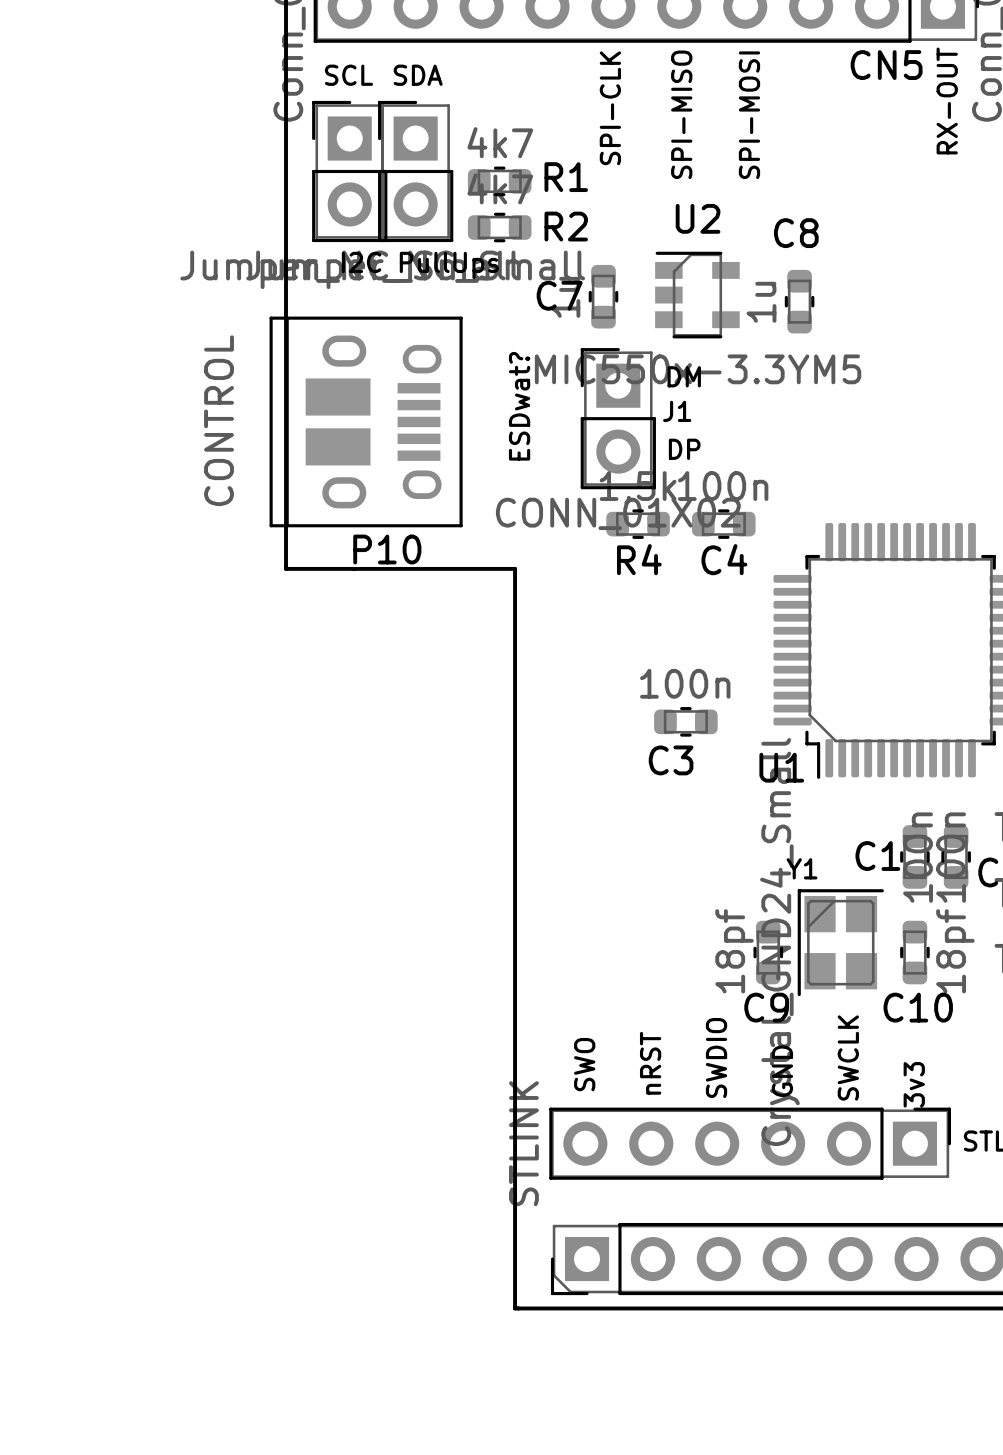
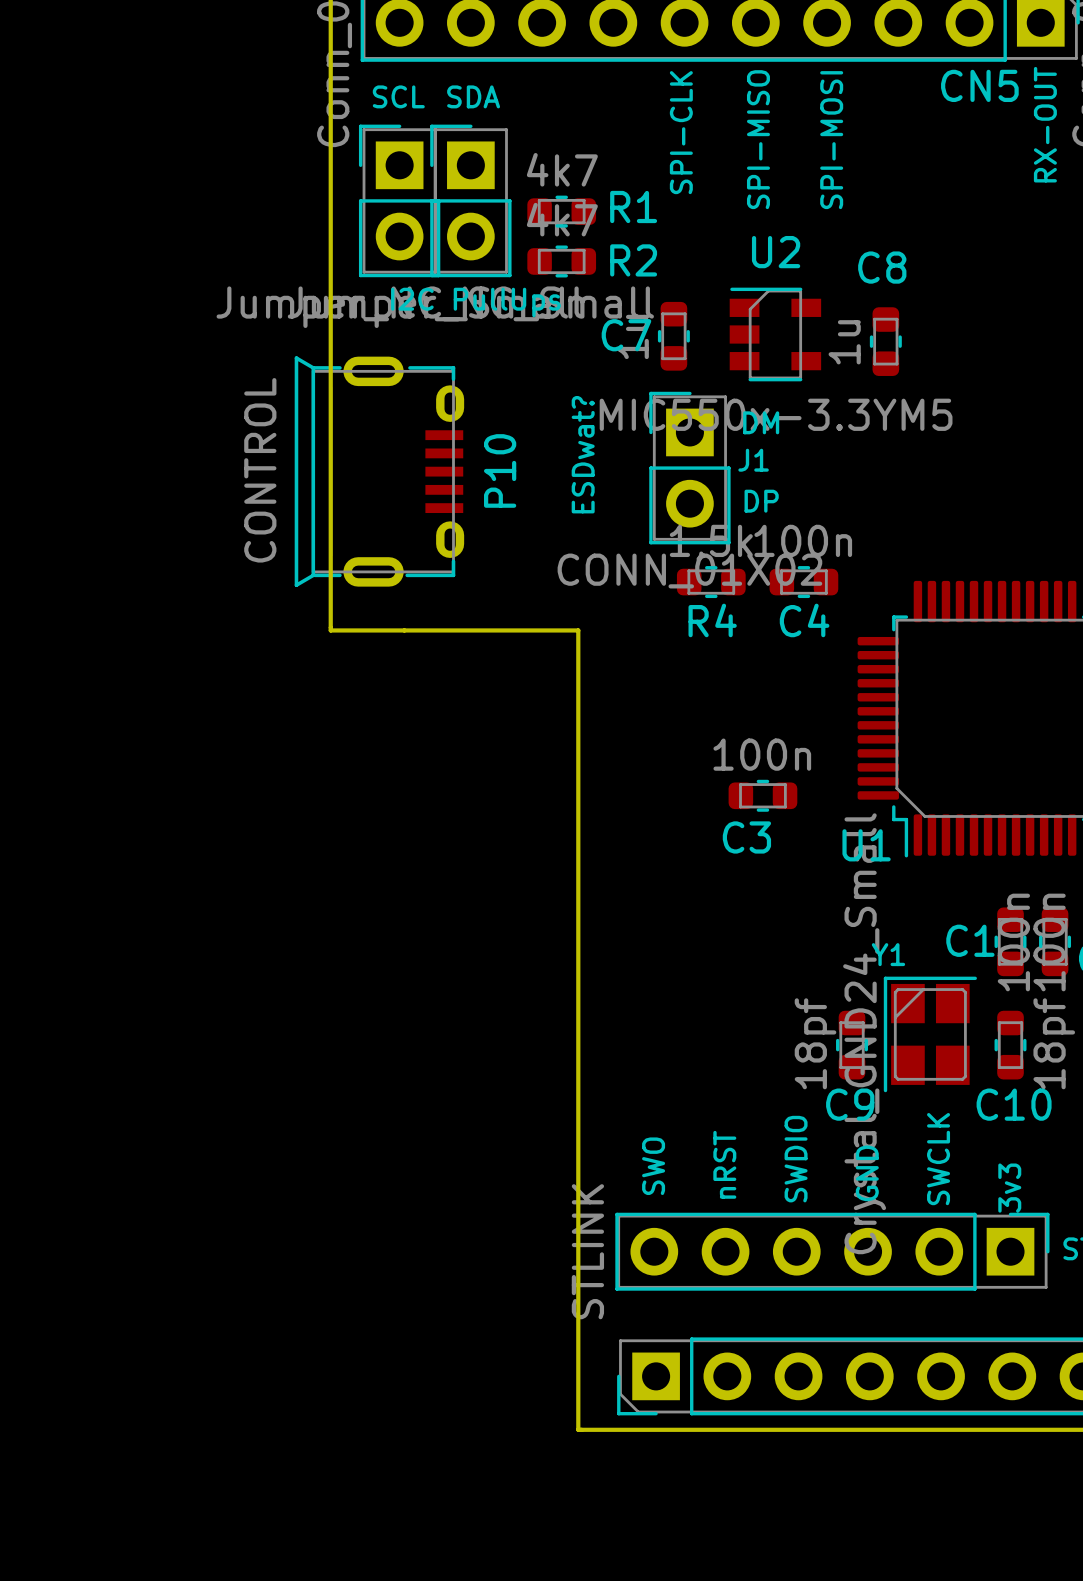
P10 footprint: [269, 316, 463, 528] -> [294, 356, 465, 587]
P10 name position: P10 (387, 549) -> P10 (500, 470)

